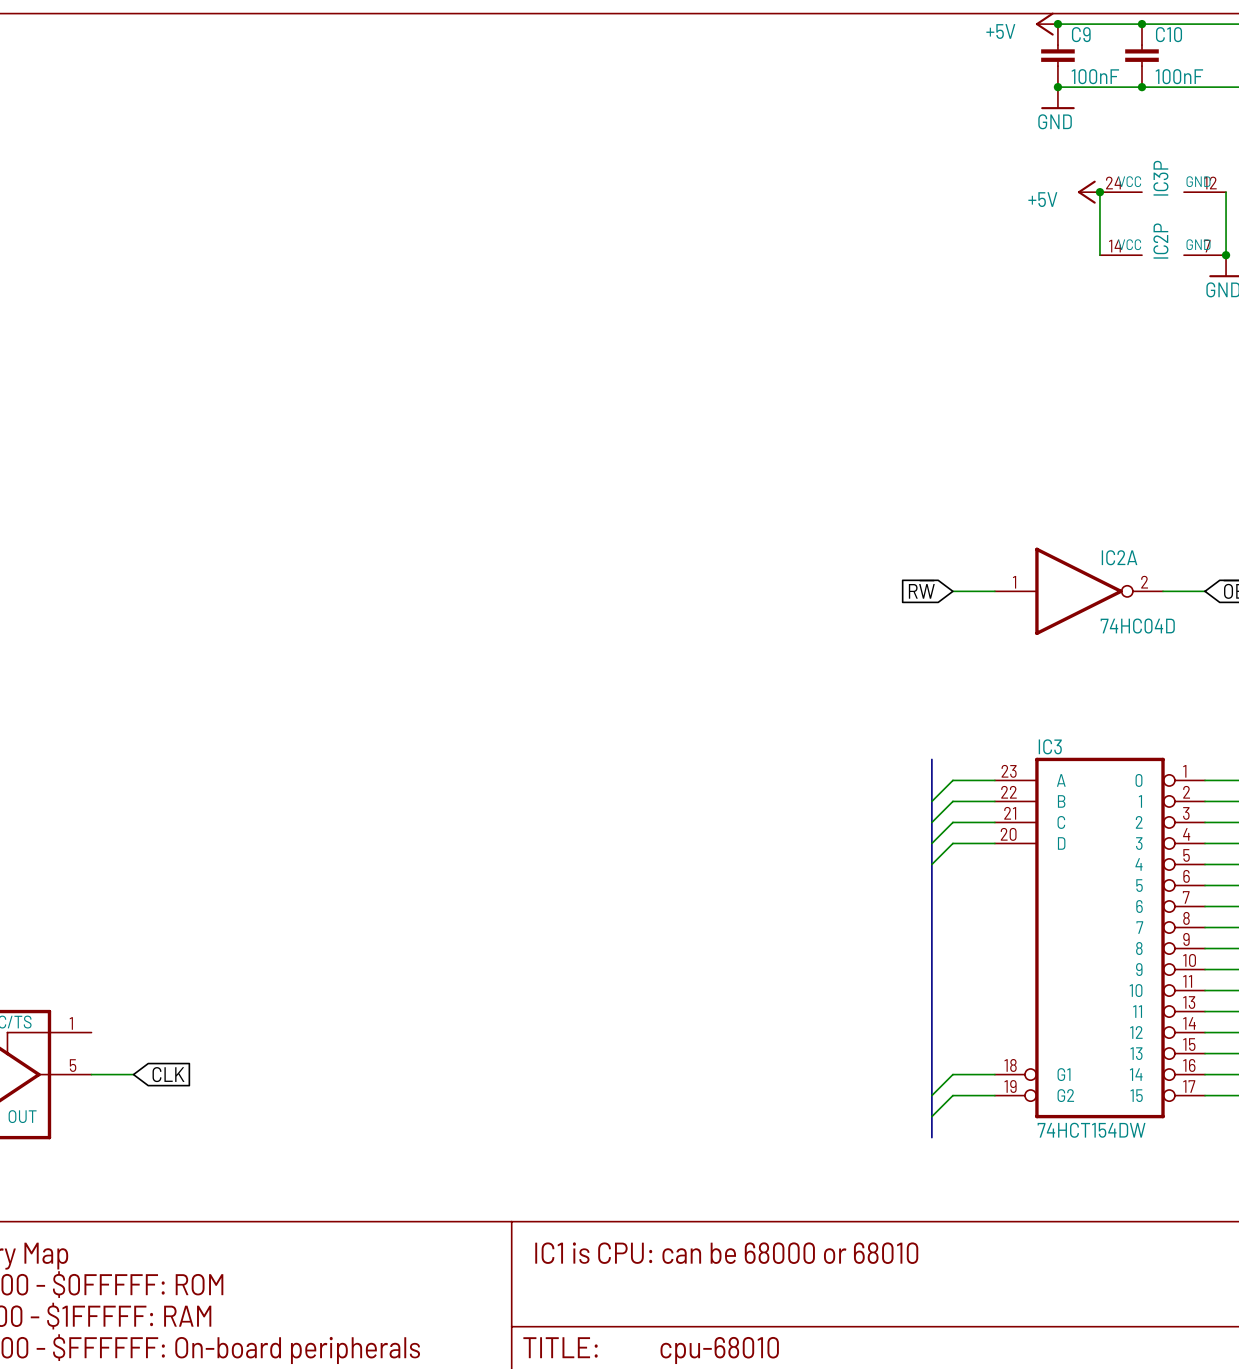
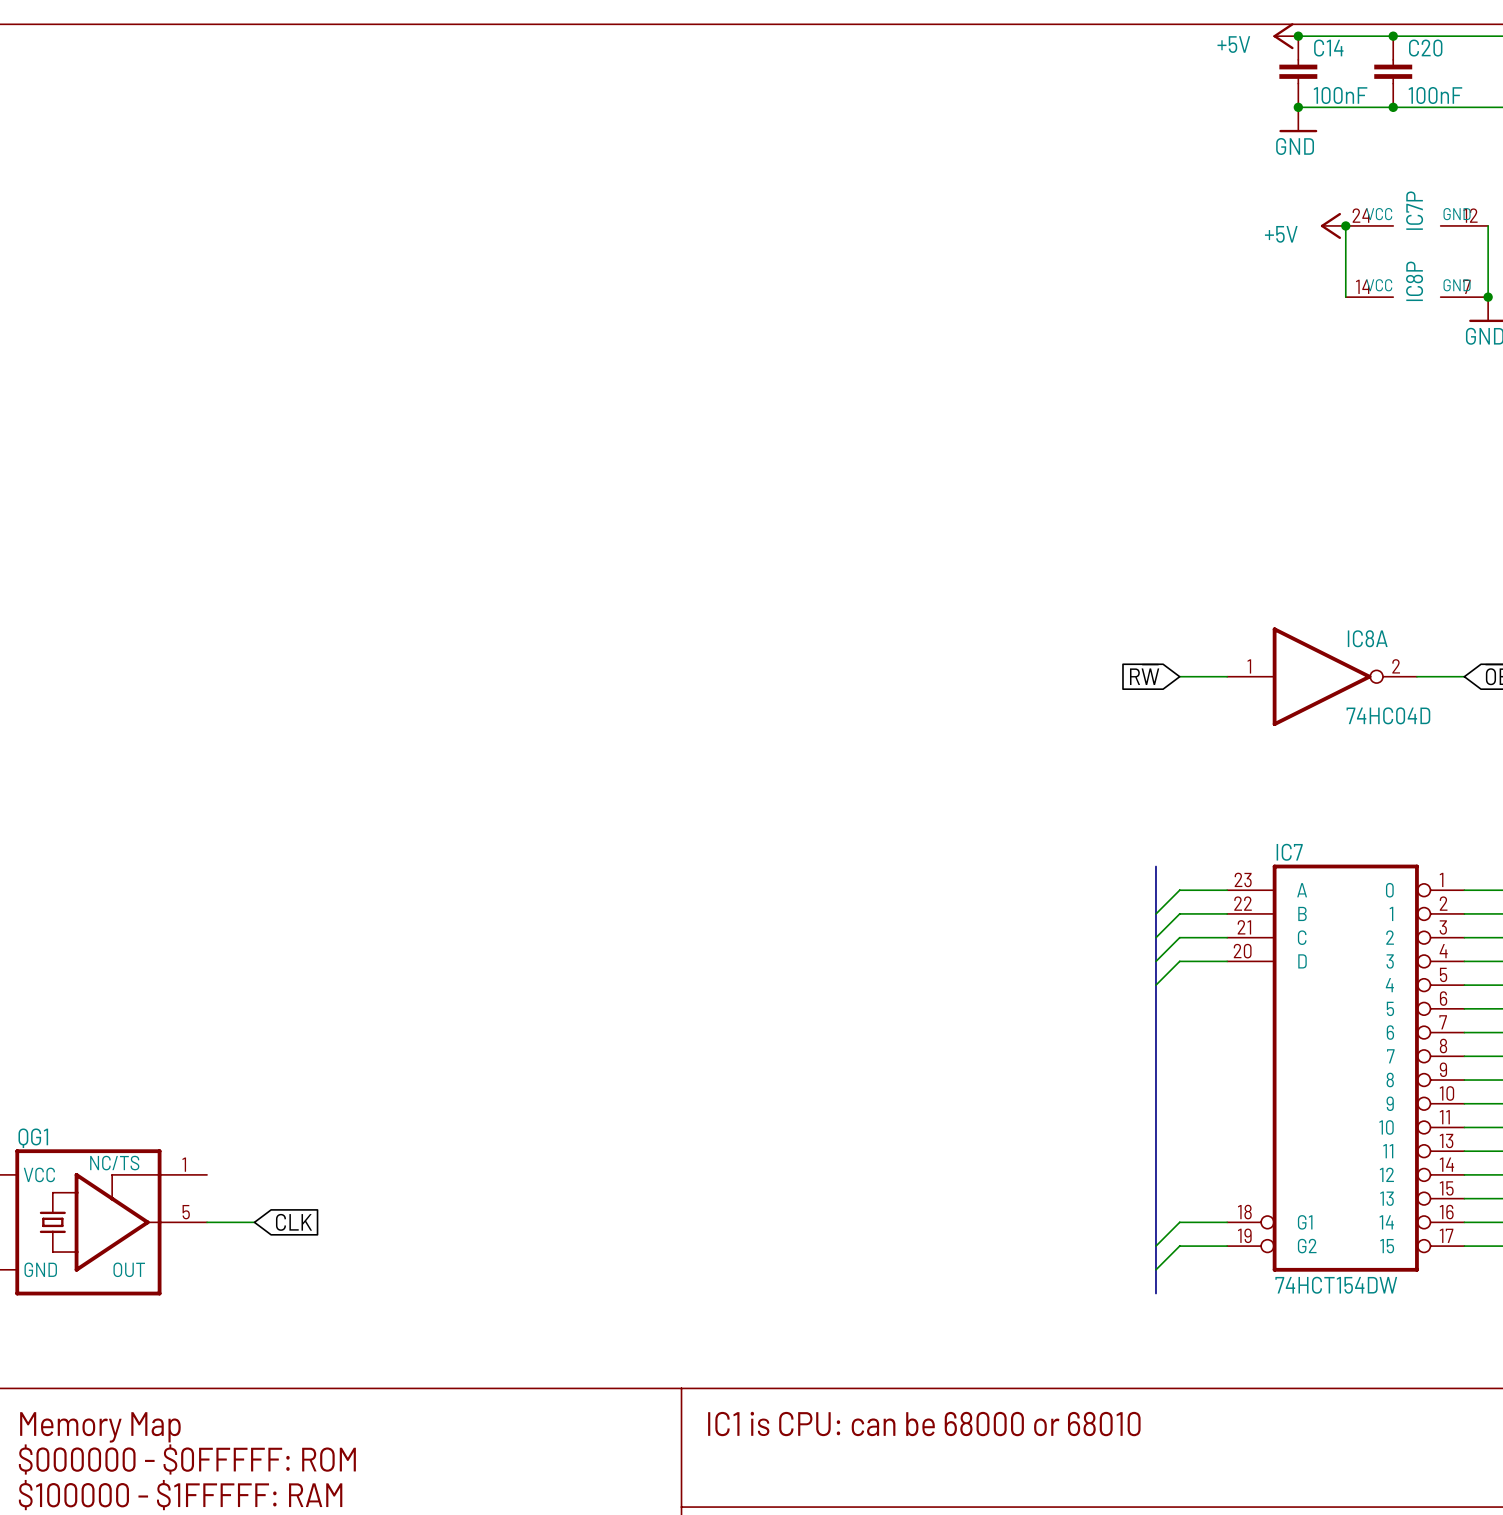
C9 name: C9 (1081, 34) -> C14 (1328, 48)
C10 name: C10 (1169, 34) -> C20 (1425, 48)
IC3P name: IC3P (1160, 178) -> IC7P (1414, 210)
IC2P name: IC2P (1160, 241) -> IC8P (1414, 281)
IC2A name: IC2A (1119, 557) -> IC8A (1367, 638)
IC3 name: IC3 (1050, 746) -> IC7 (1289, 852)

